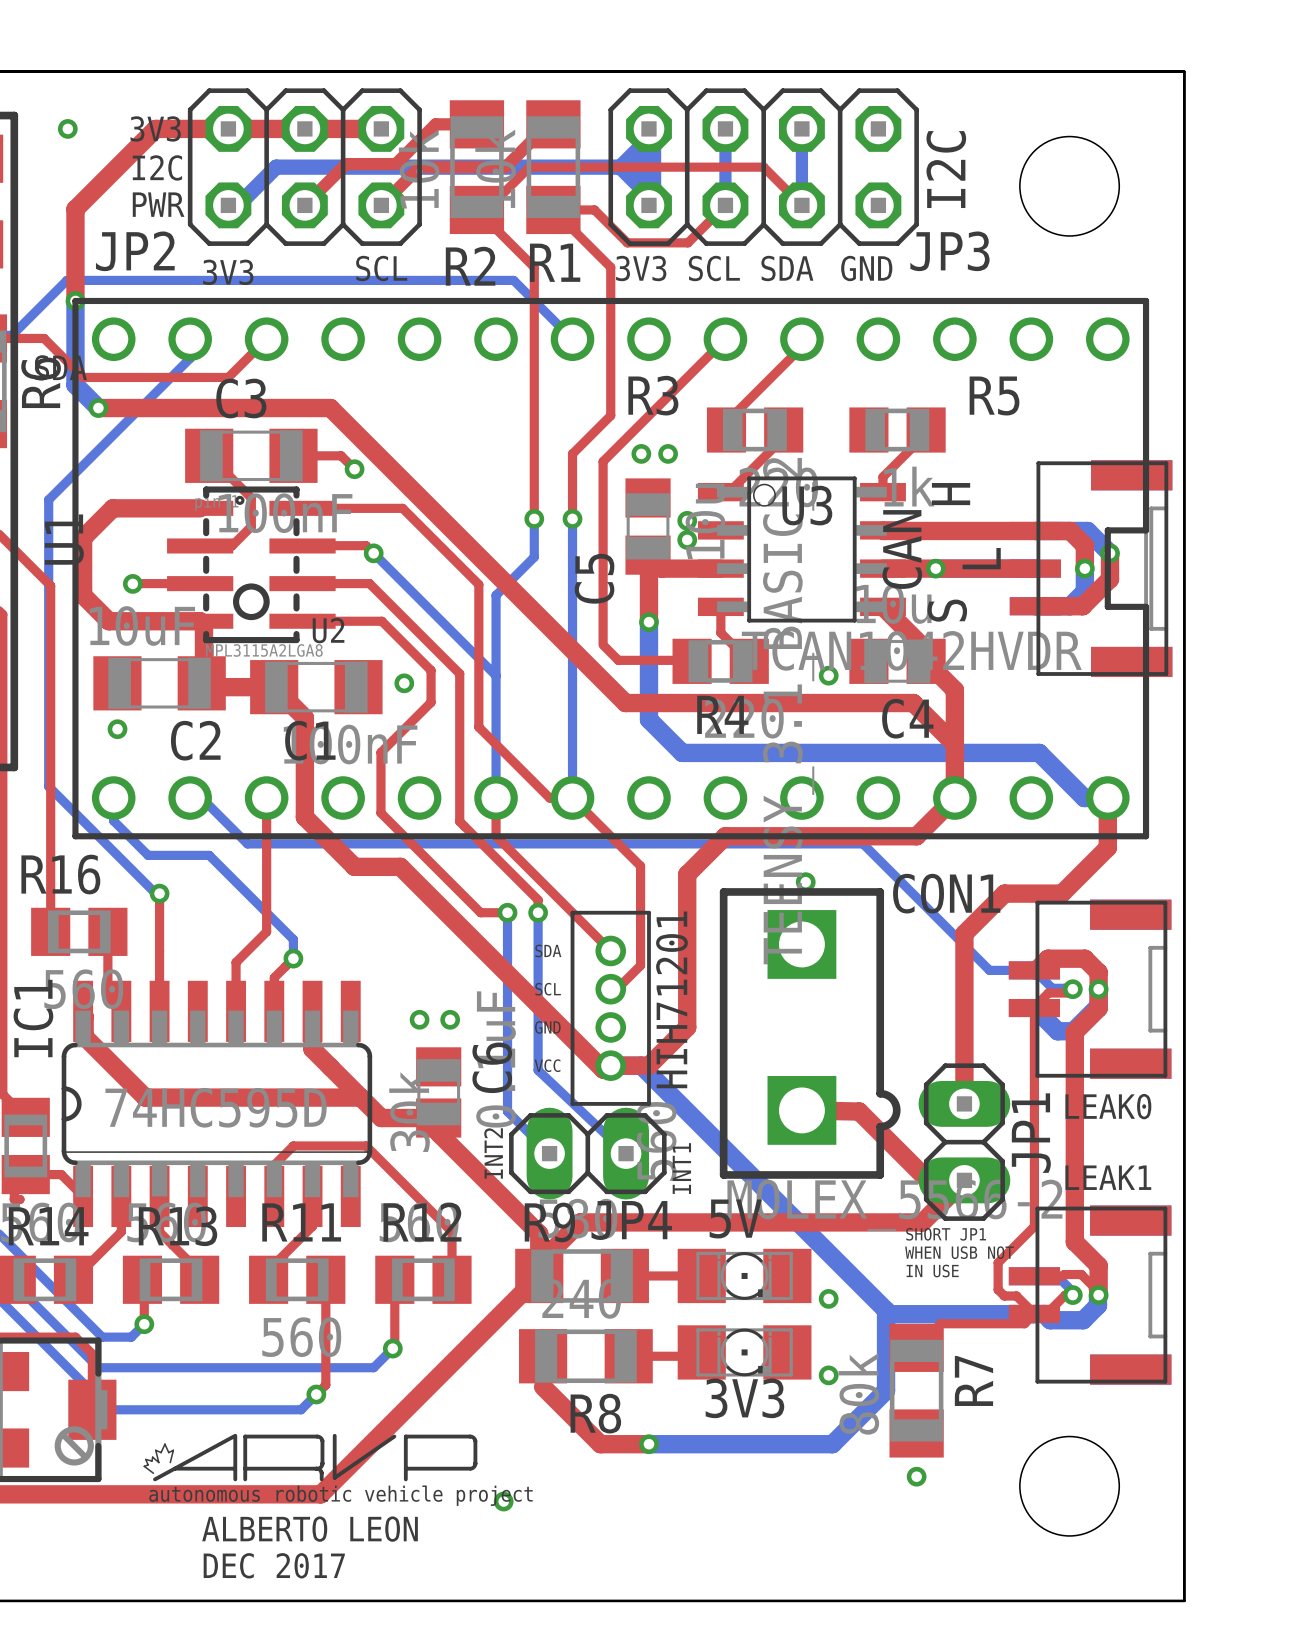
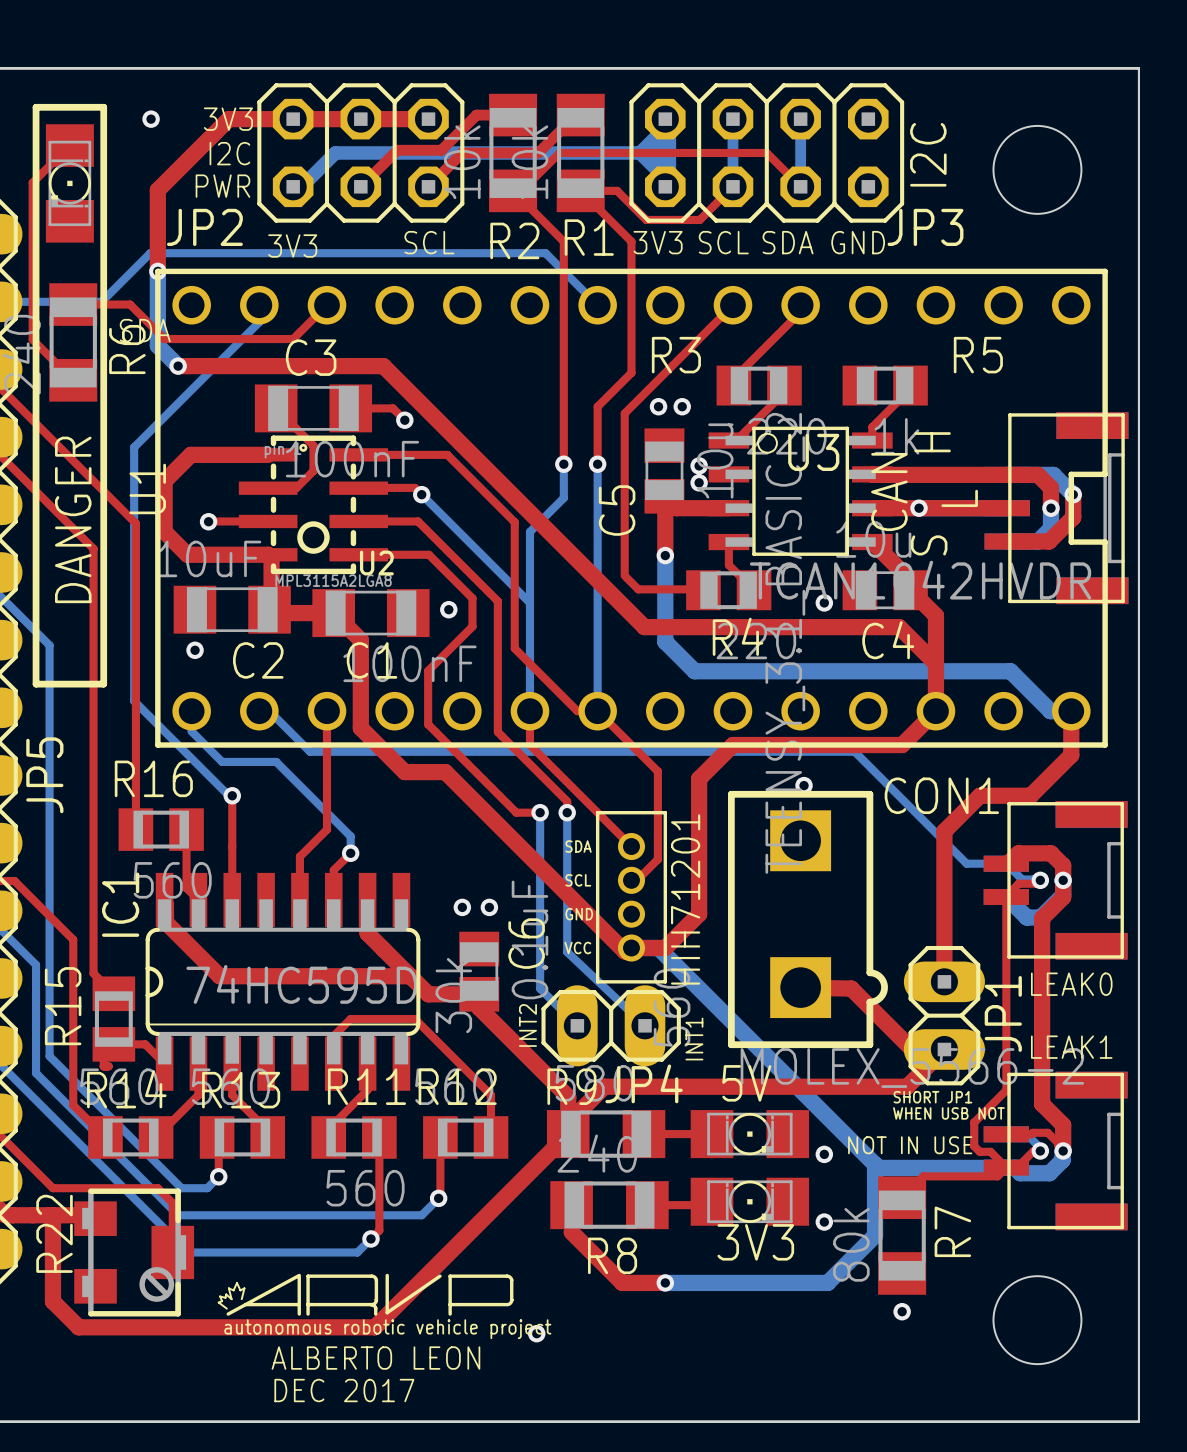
text: IN USE (932, 1271) -> NOT IN USE (910, 1145)

